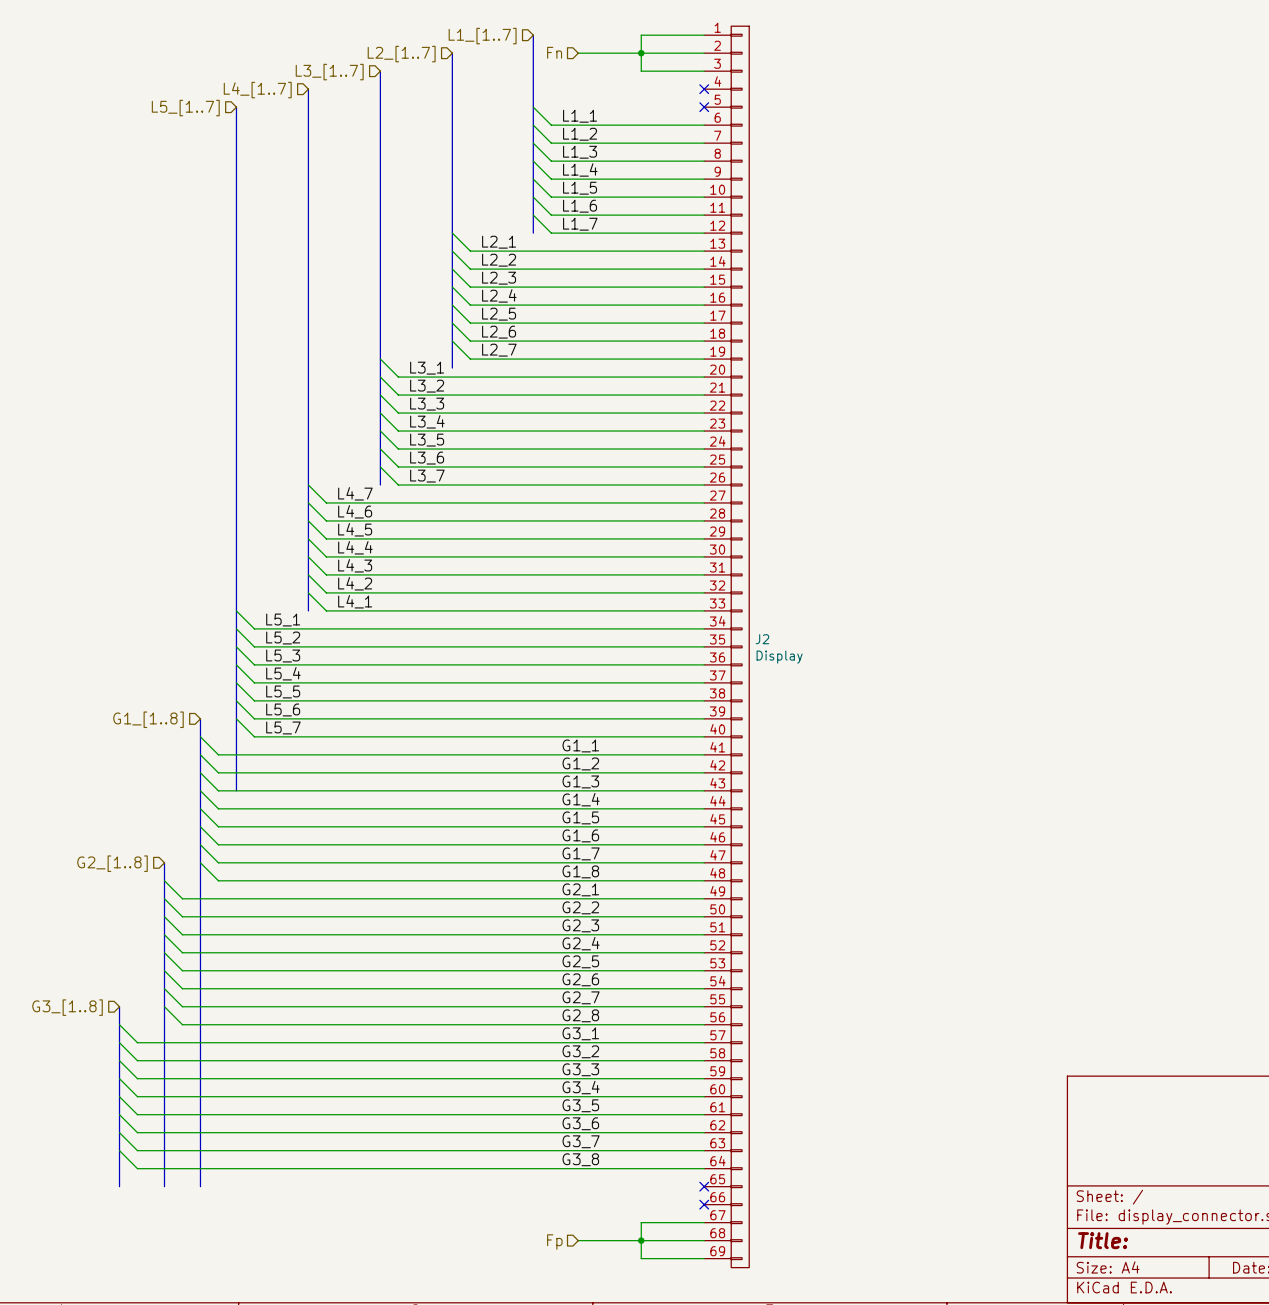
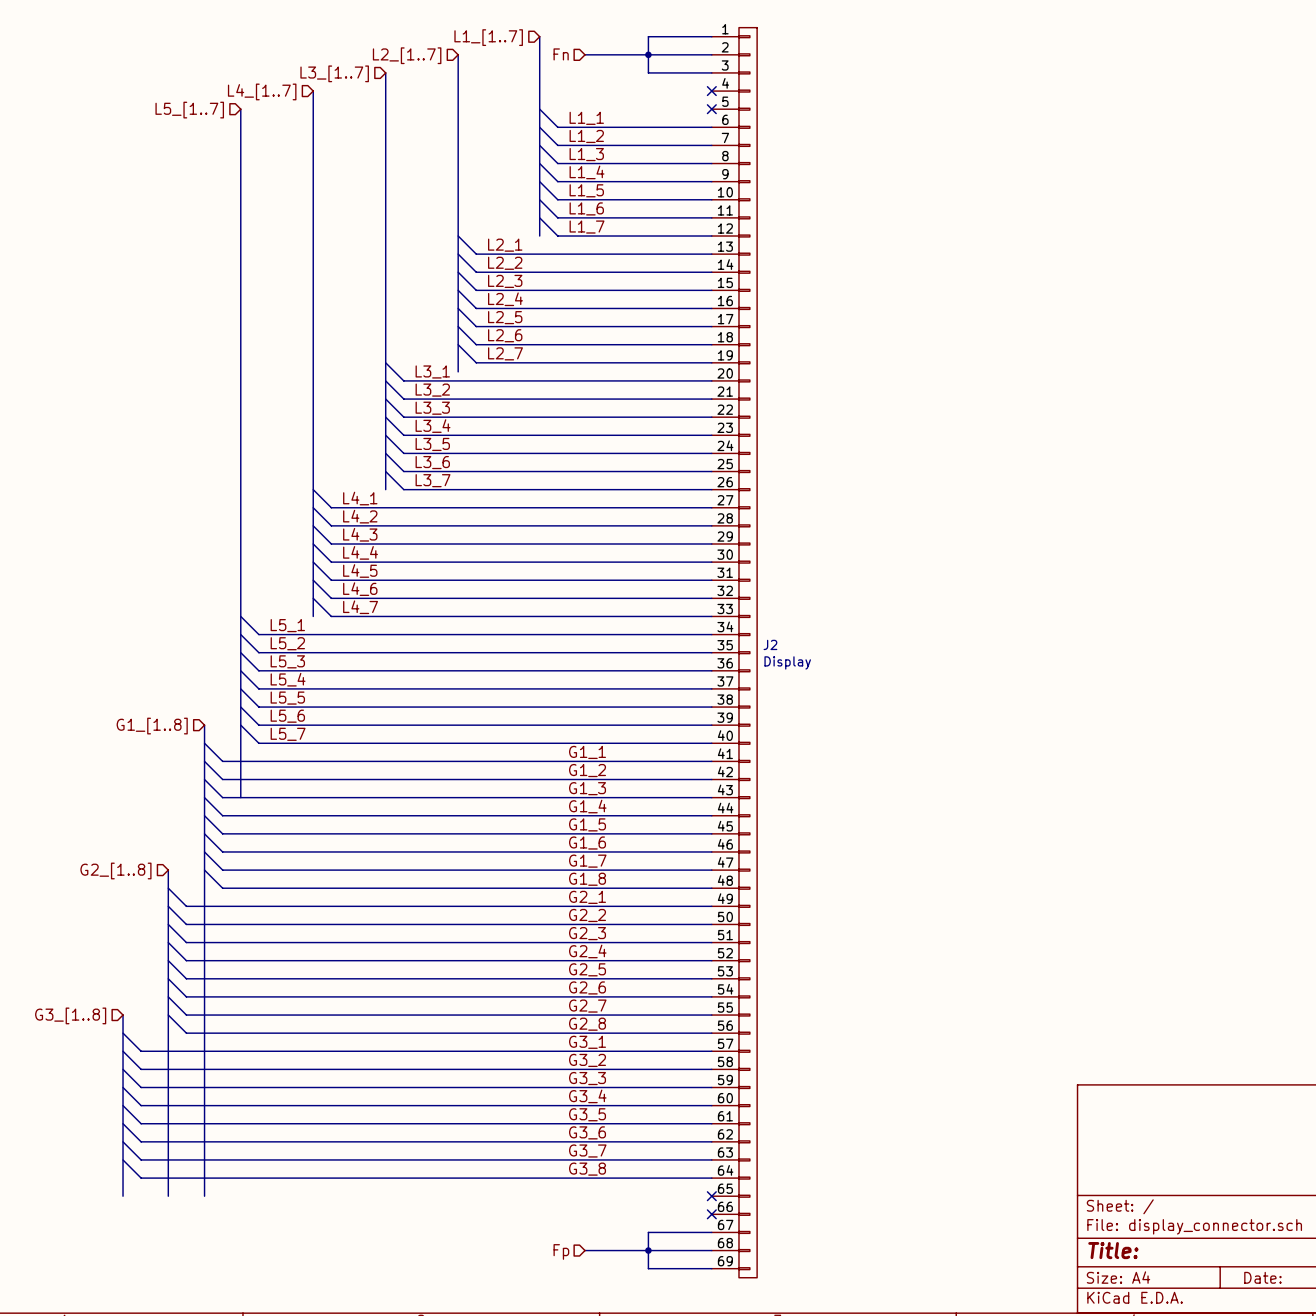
label: L4_7 (355, 493) -> L4_1 (360, 498)
label: L4_6 (355, 511) -> L4_2 (360, 516)
label: L4_5 (355, 529) -> L4_3 (360, 534)
label: L4_3 (355, 565) -> L4_5 (360, 571)
label: L4_2 (355, 583) -> L4_6 (360, 589)
label: L4_1 (355, 601) -> L4_7 (360, 607)

